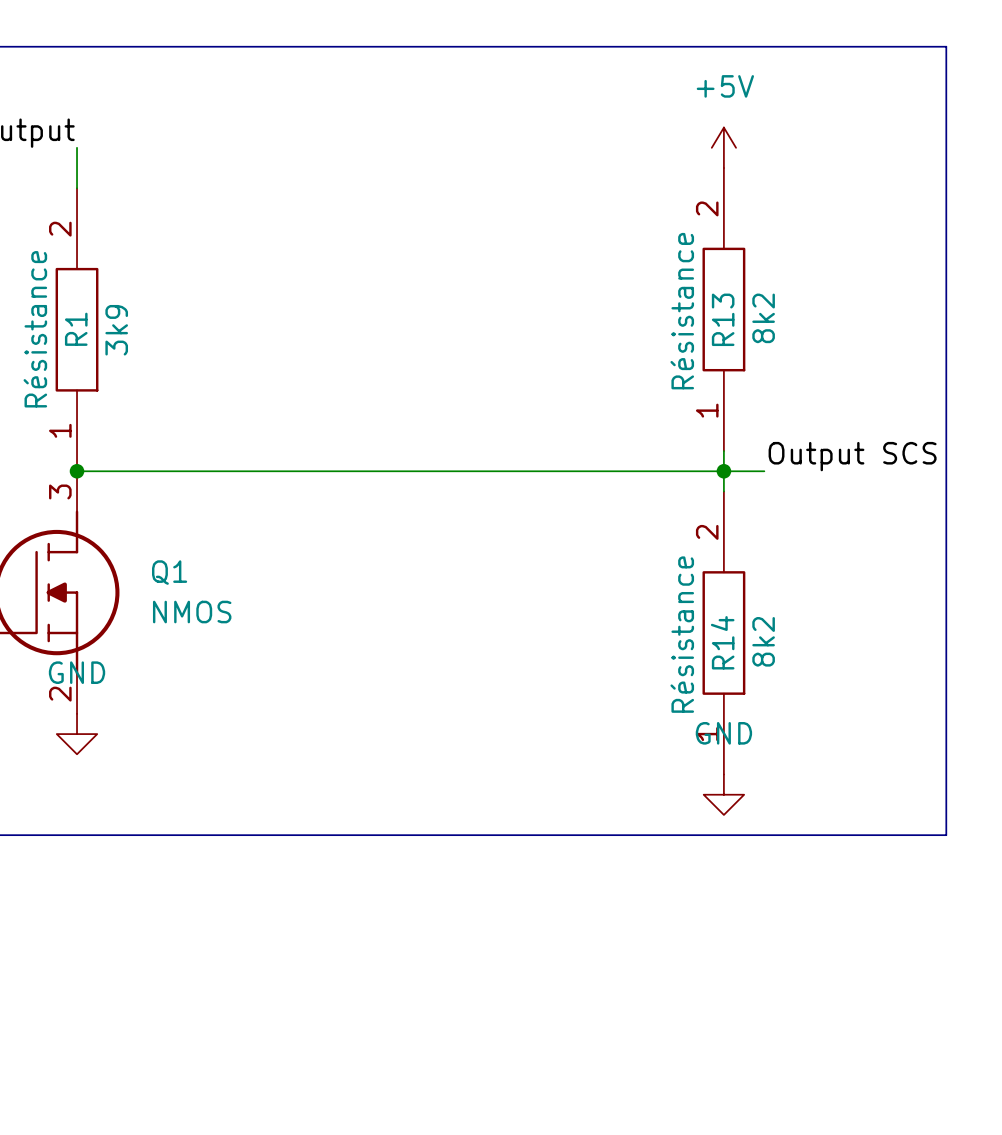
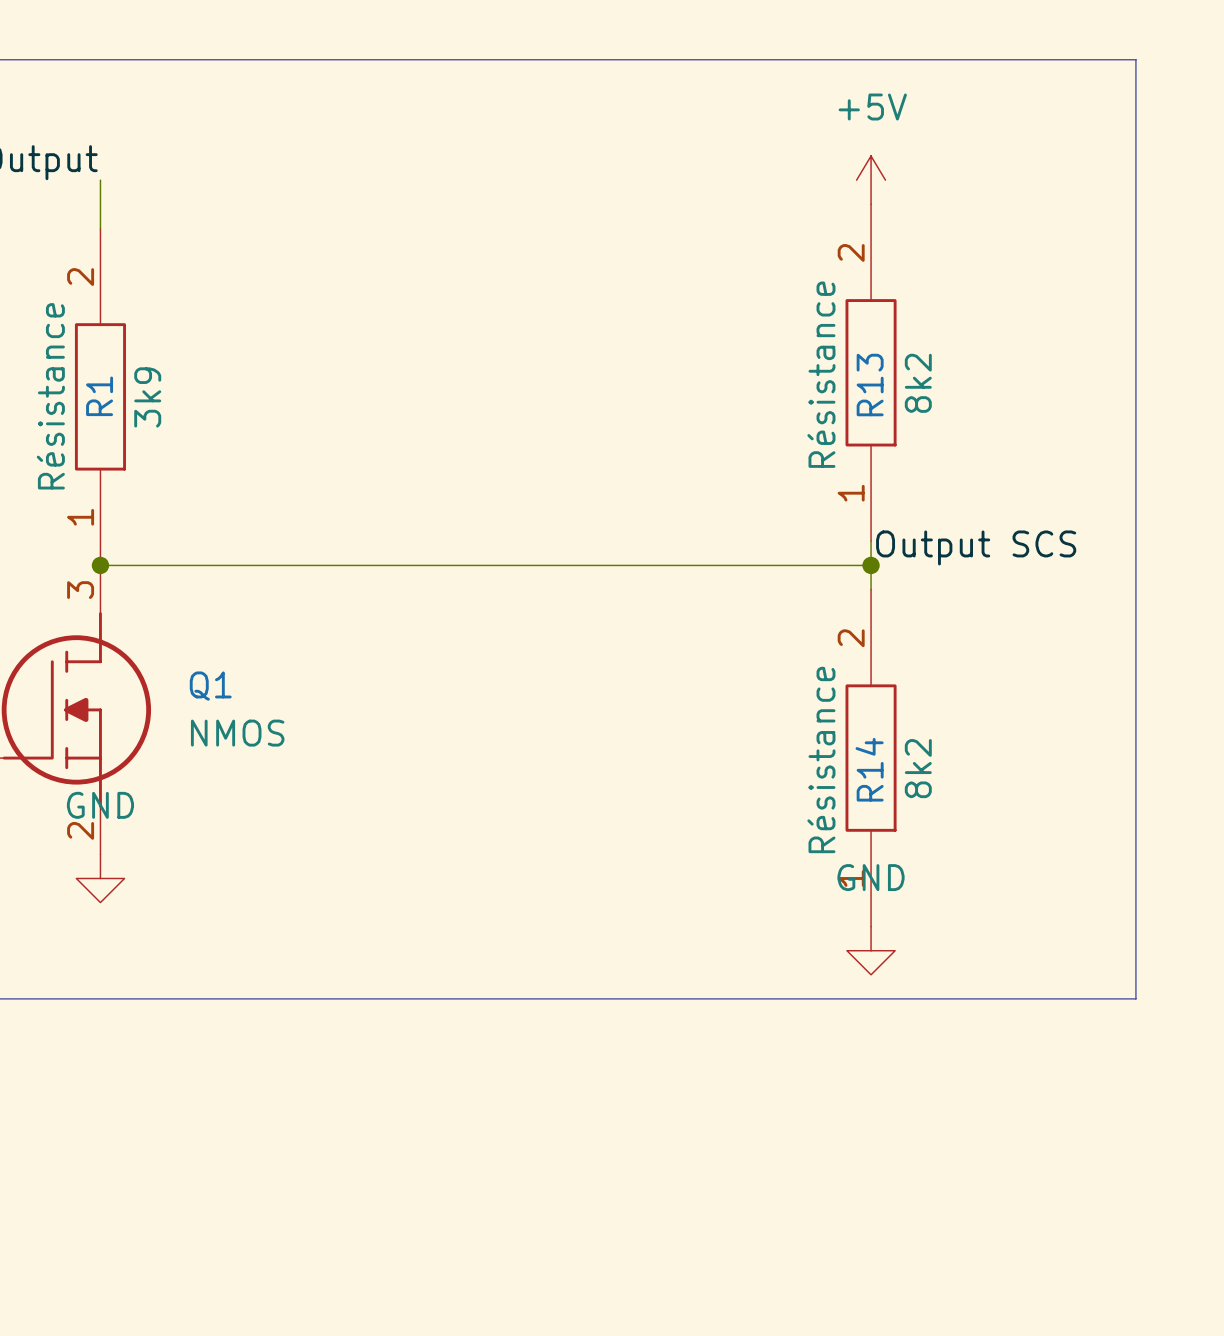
label position: Output SCS (852, 456) -> Output SCS (976, 547)
wire: (723, 471) (764, 471) -> none

